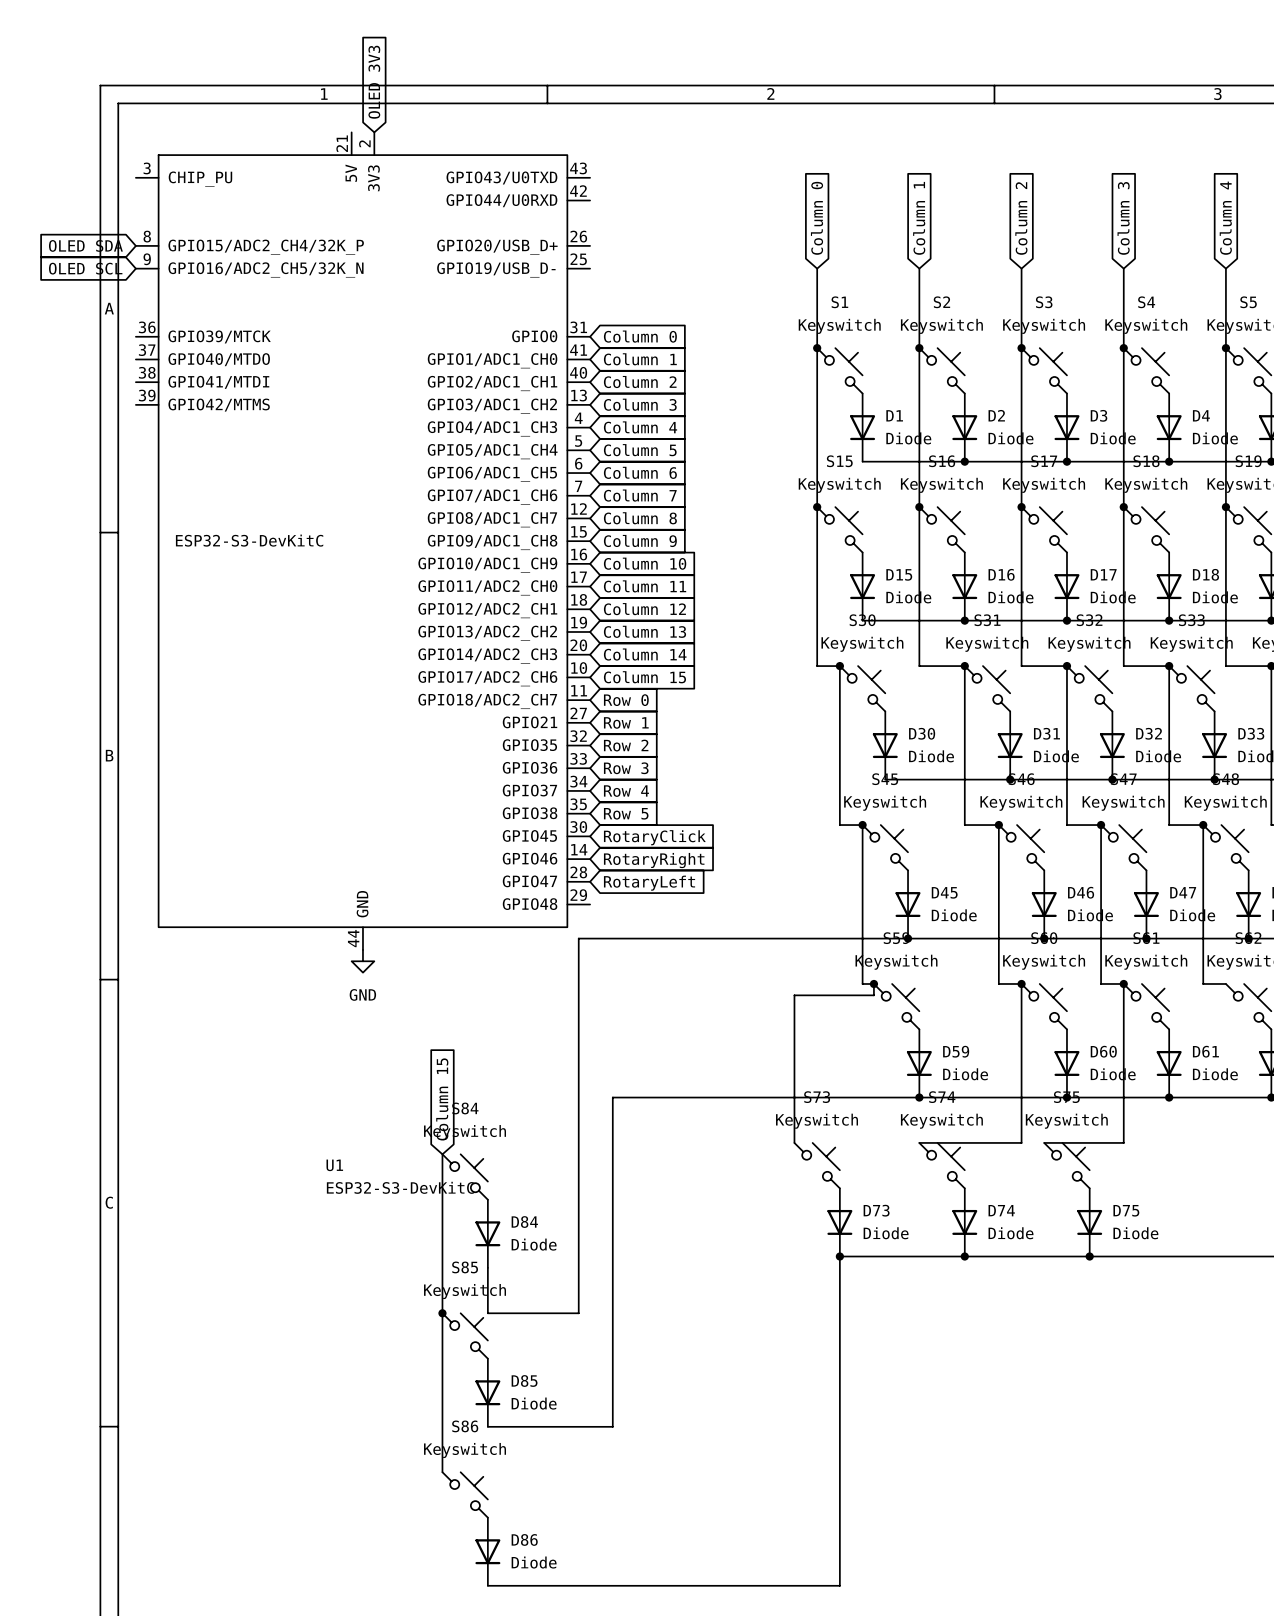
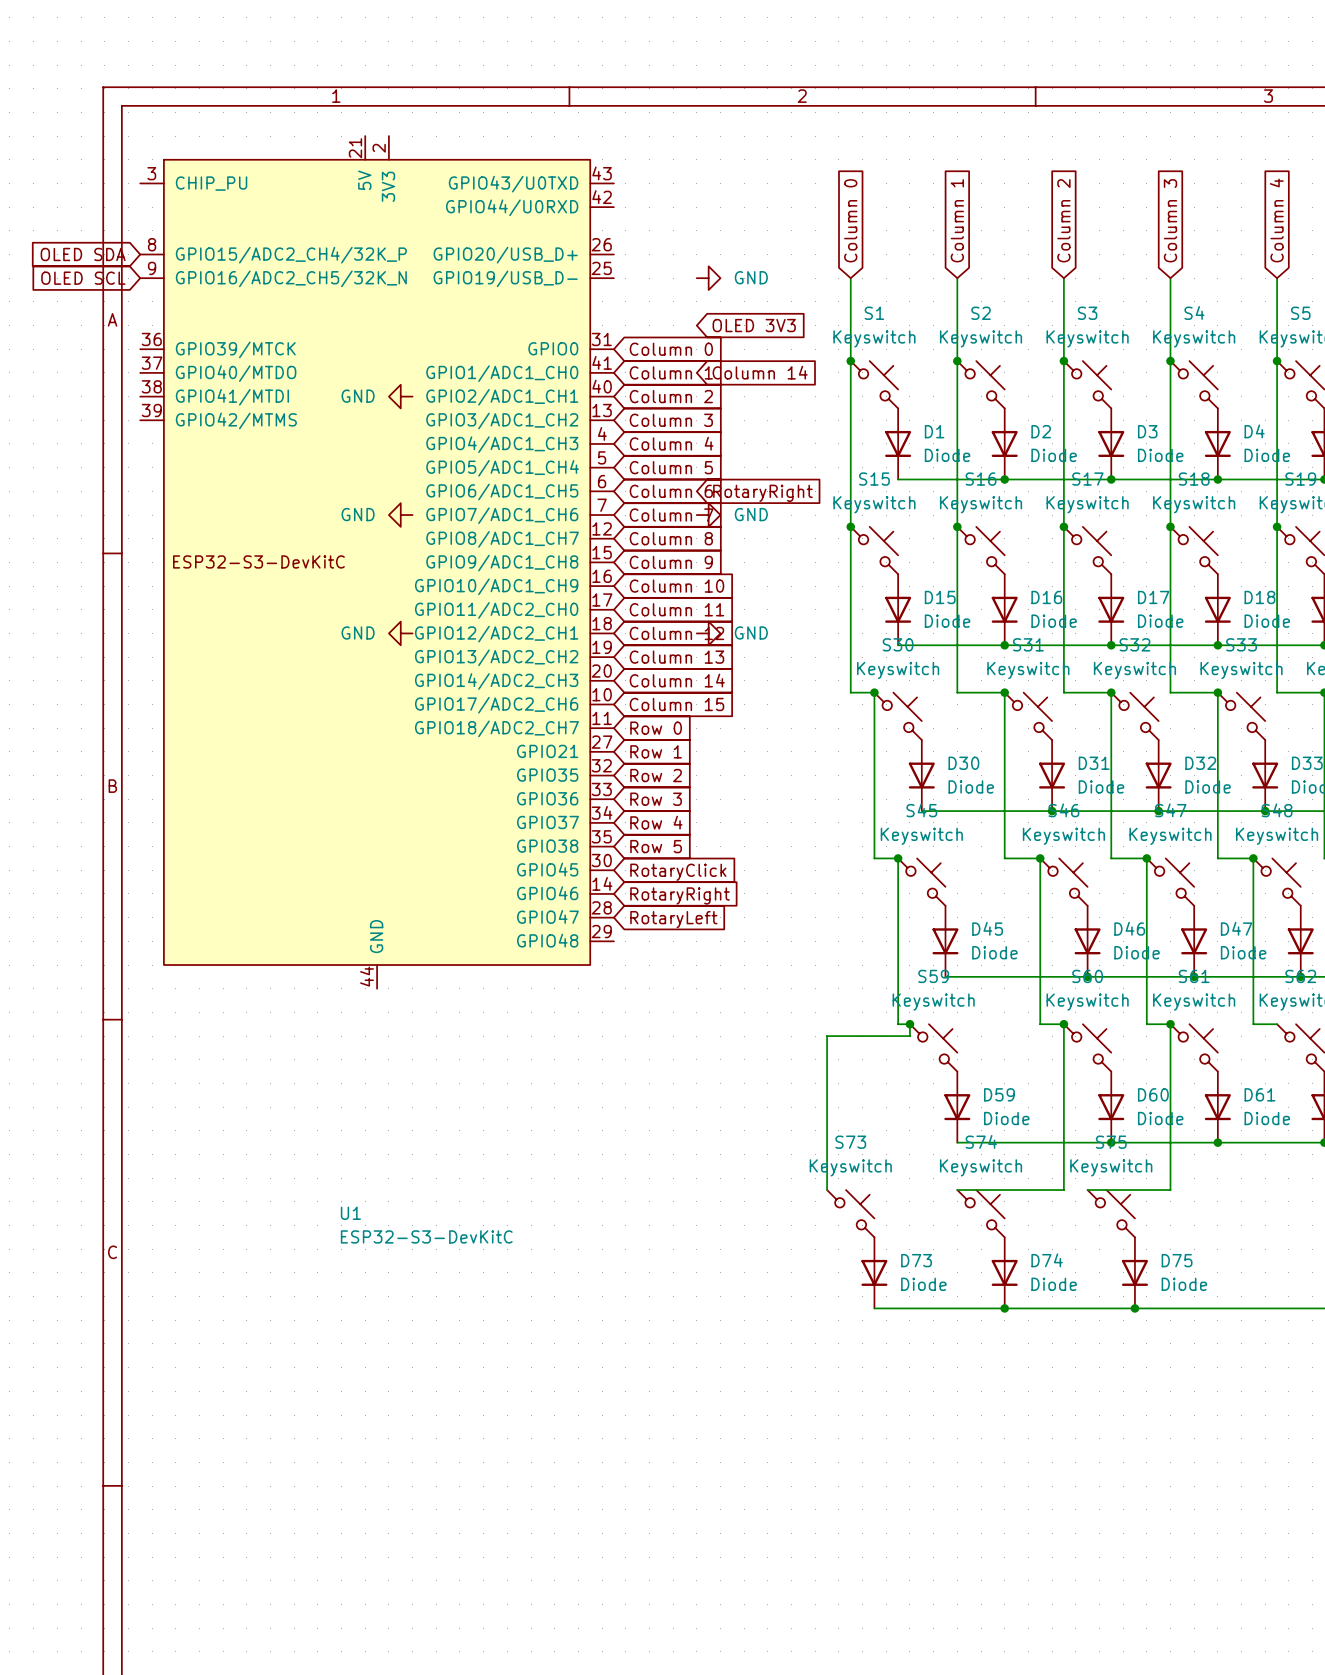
global label: OLED 3V3 (374, 82) -> none
power symbol: none -> GND (708, 278)
global label: none -> OLED 3V3 (754, 325)
global label: none -> Column 14 (760, 372)
power symbol: none -> GND (400, 396)
global label: none -> RotaryRight (762, 493)
power symbol: none -> GND (400, 515)
power symbol: none -> GND (708, 515)
power symbol: none -> GND (400, 633)
power symbol: none -> GND (708, 633)
wire: (908, 938) (578, 938) (578, 1313) (487, 1313) (487, 1267) -> none
junction: (908, 938) -> none
power symbol: GND (362, 961) -> none
wire: (919, 1097) (612, 1097) (612, 1426) (487, 1426) -> none
junction: (919, 1097) -> none
global label: Column 15 (442, 1099) -> none
wire: (442, 1154) (442, 1472) -> none
S84: Keyswitch (465, 1177) -> none
D84: Diode (487, 1233) -> none
wire: (839, 1256) (839, 1585) (487, 1585) -> none
junction: (839, 1256) -> none
junction: (442, 1313) -> none
S85: Keyswitch (465, 1335) -> none
D85: Diode (487, 1392) -> none
S86: Keyswitch (465, 1494) -> none
D86: Diode (487, 1551) -> none

